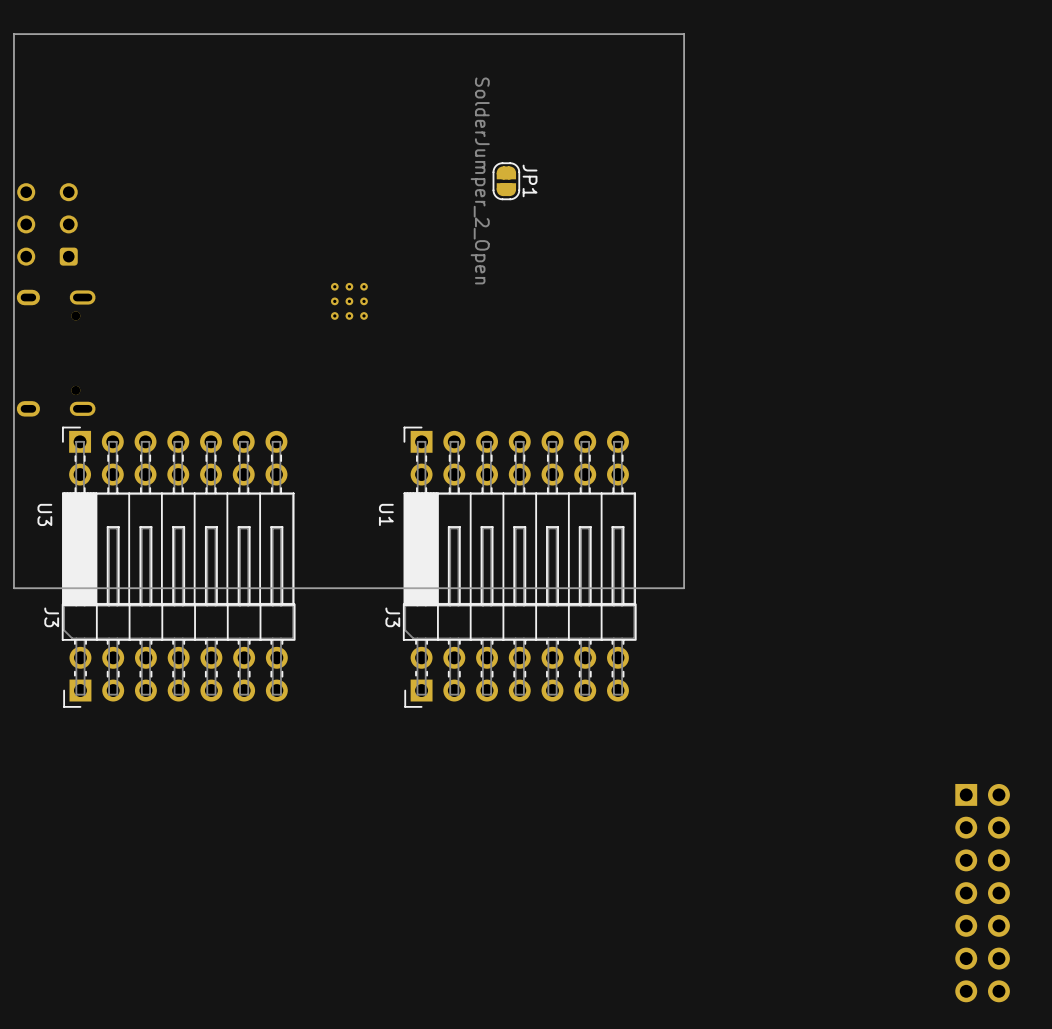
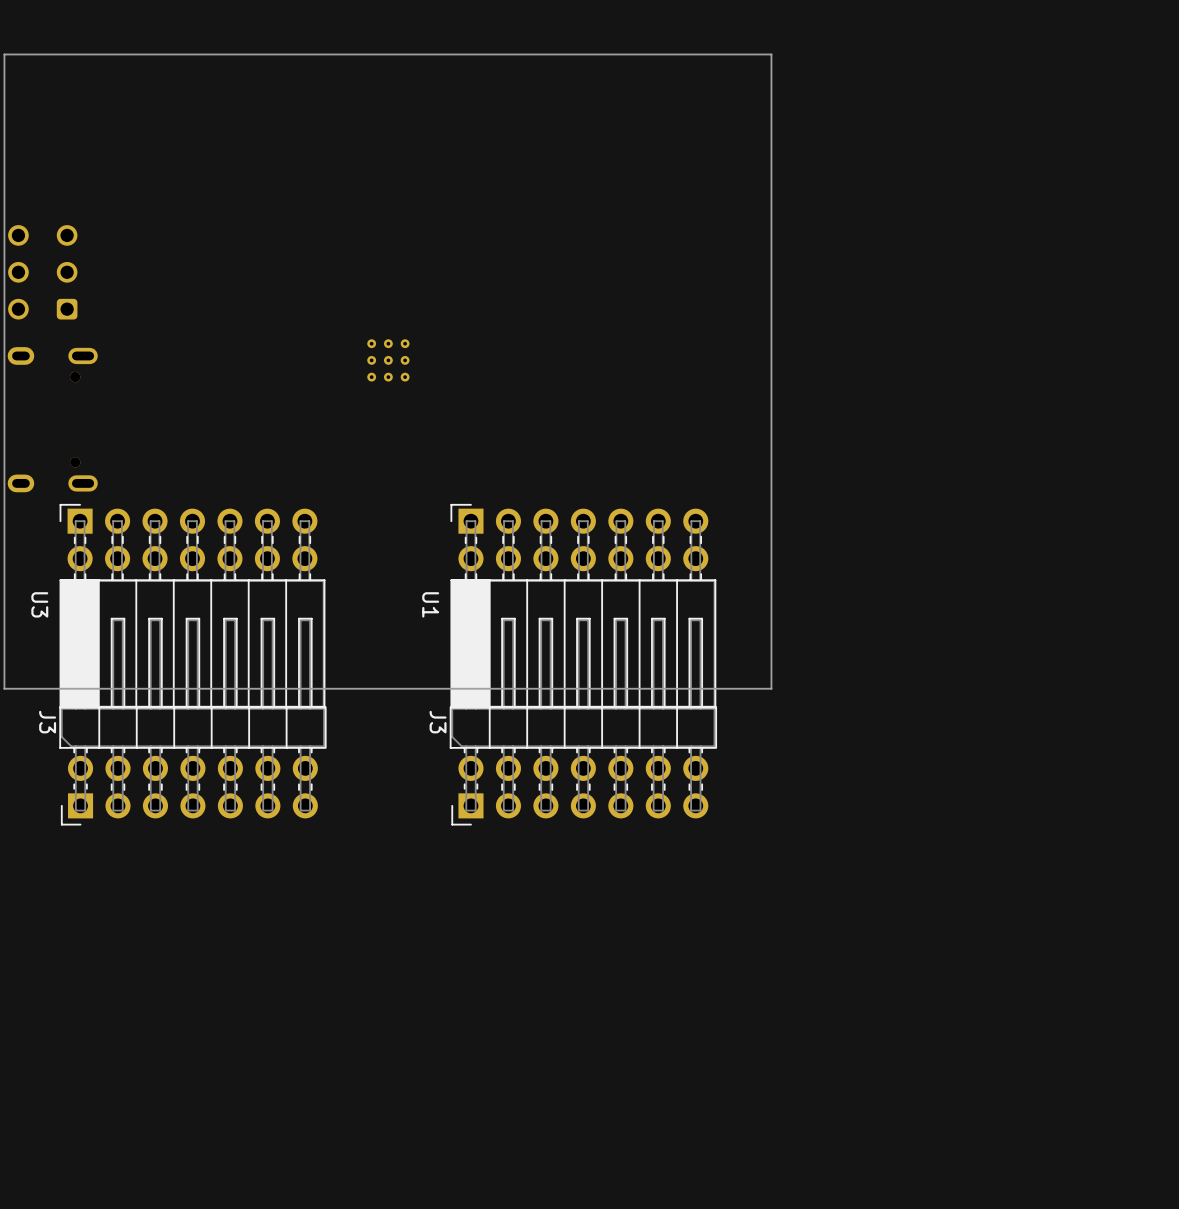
JP1: SolderJumper_2_Open (506, 181) -> none
part: (982, 893) -> none

